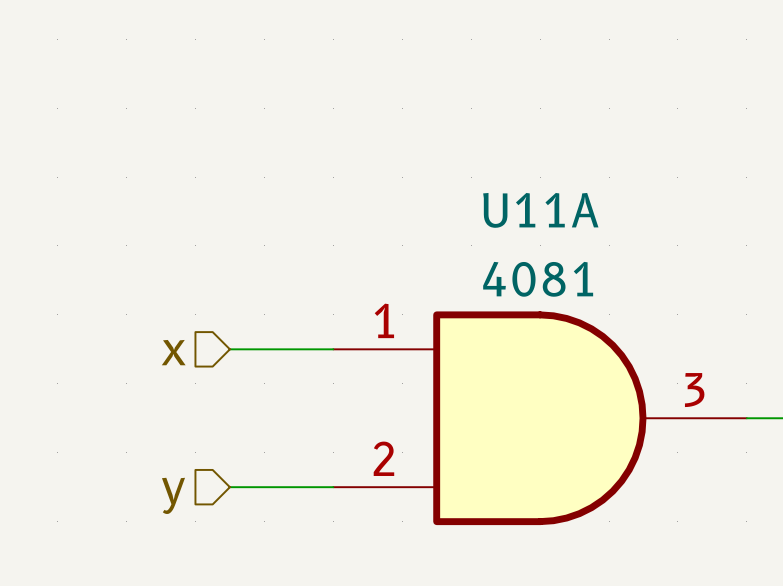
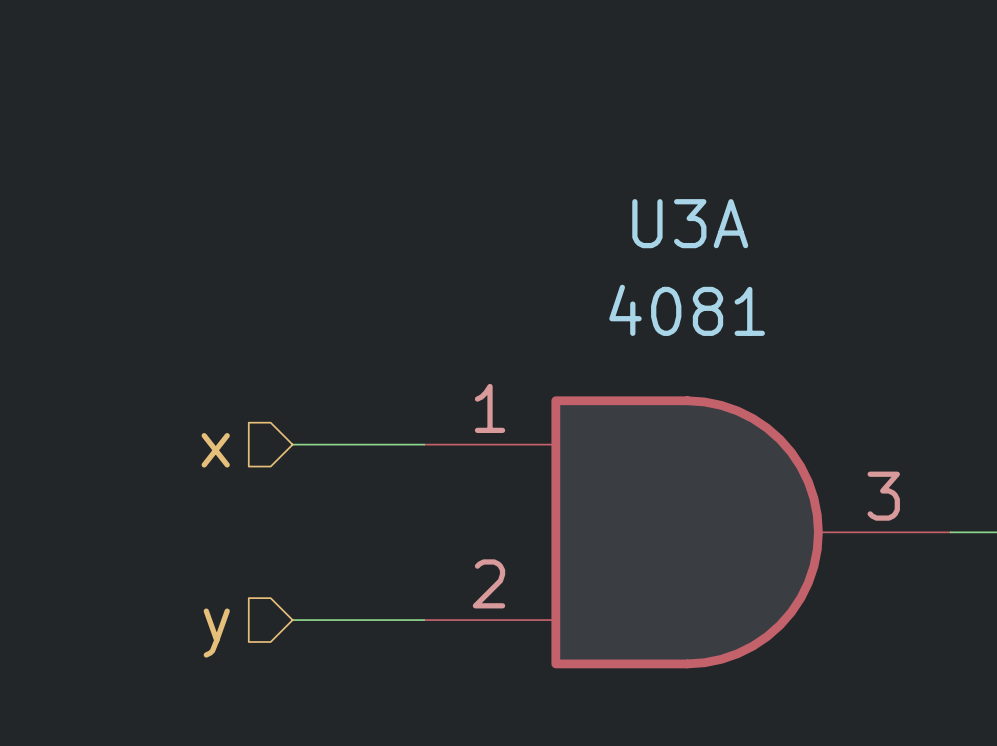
U11A name: U11A (540, 210) -> U3A (690, 223)
U11A value position: 4081 (538, 279) -> 4081 (687, 310)

